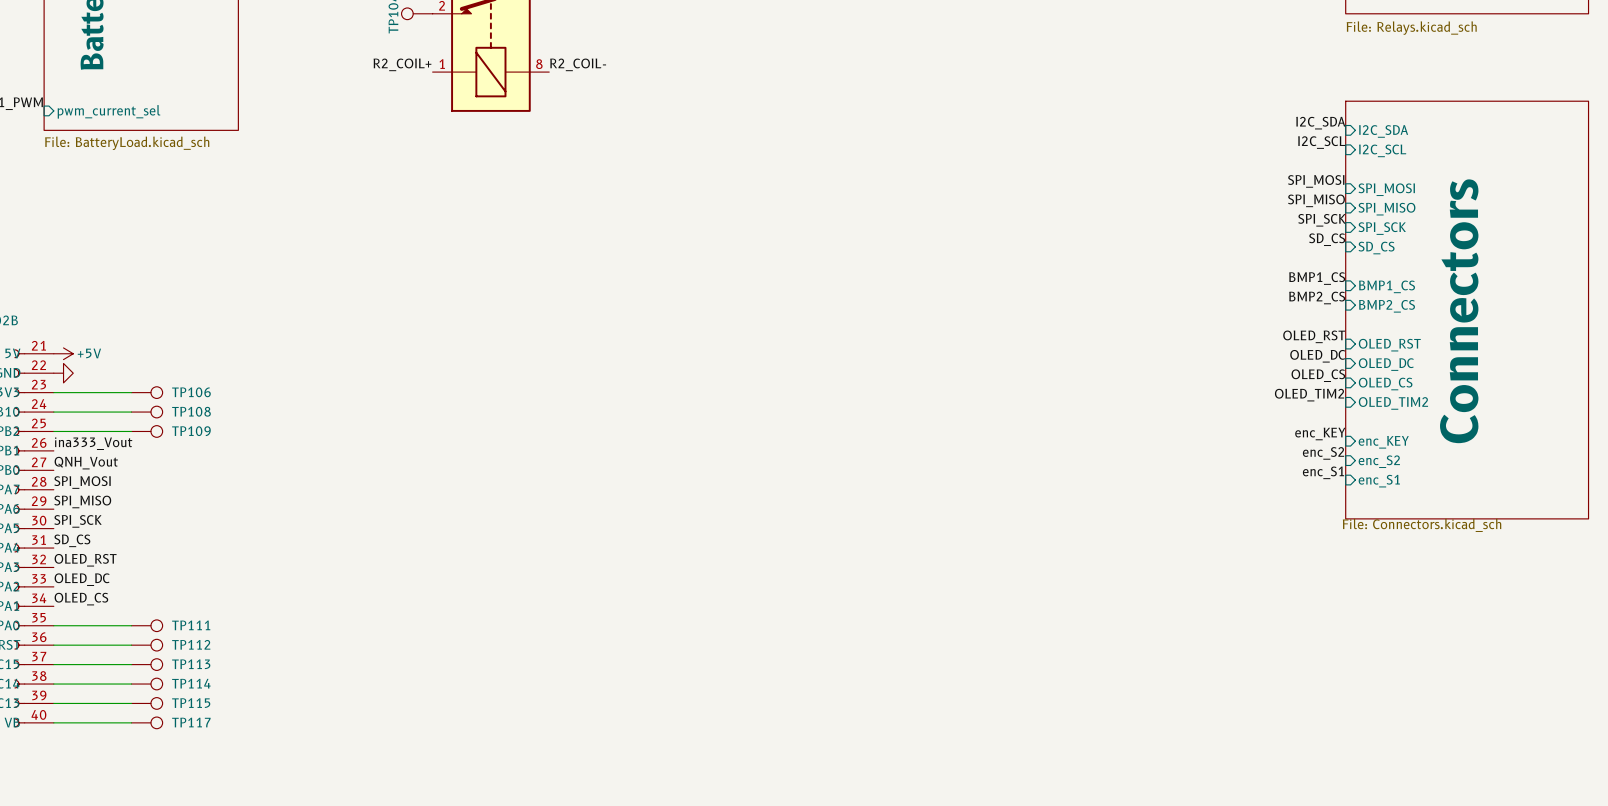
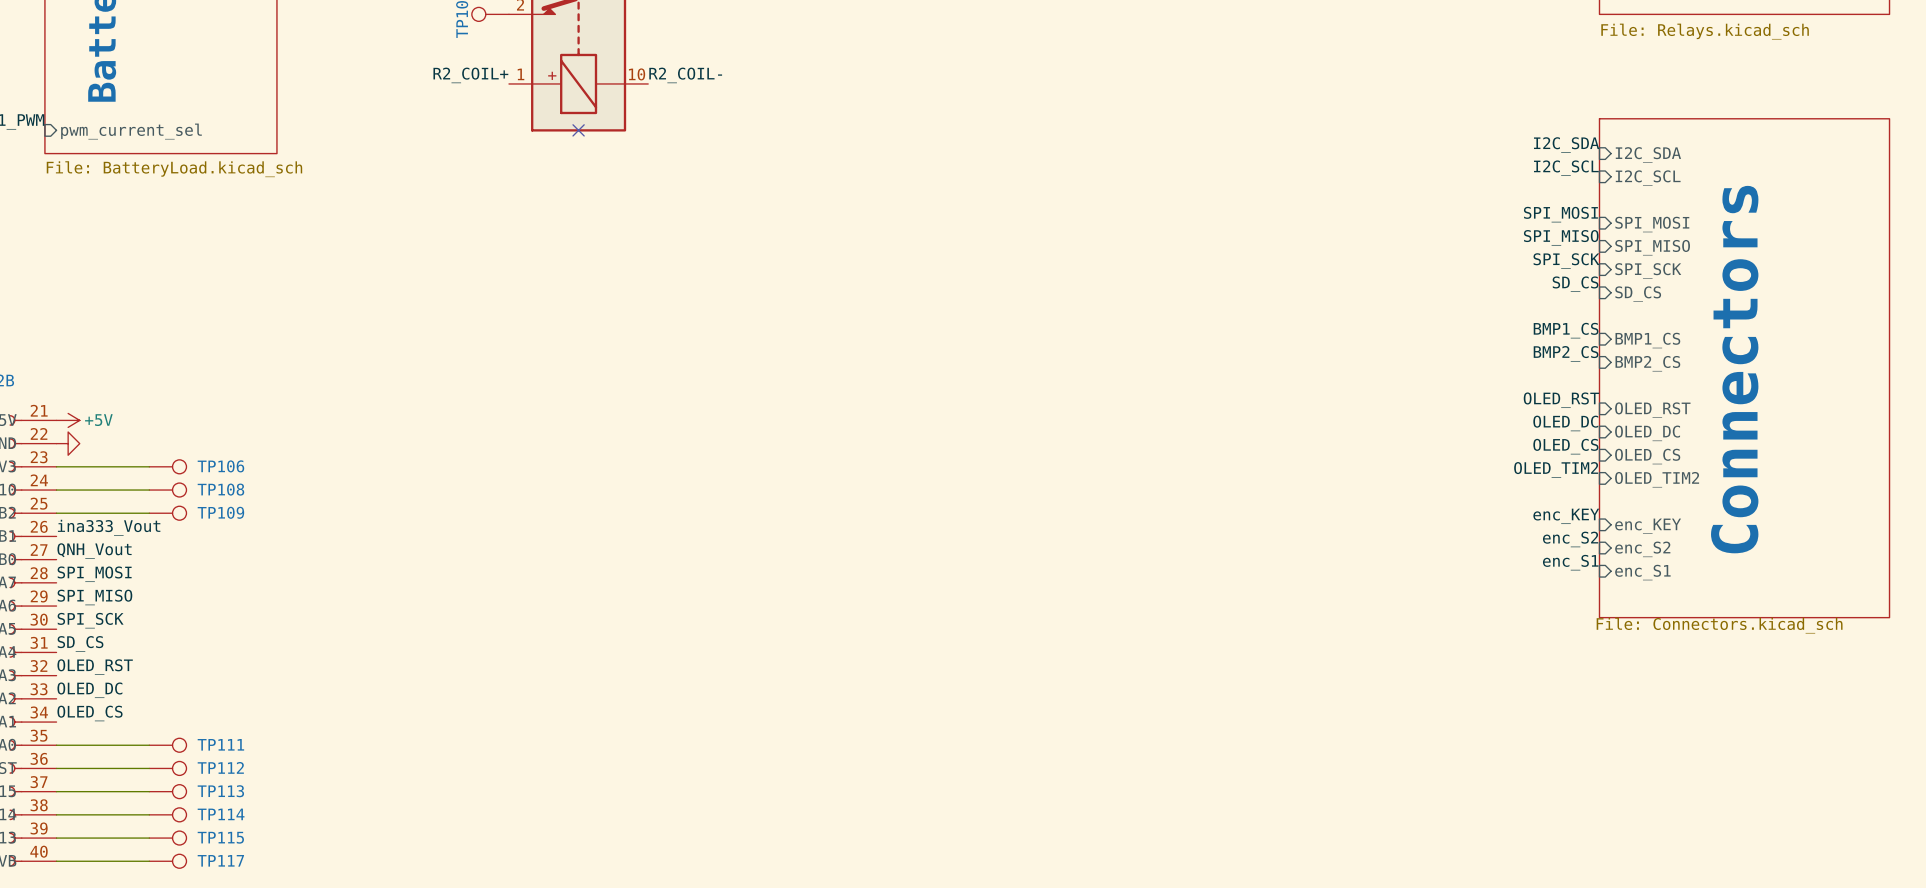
part pin number: 8 (539, 64) -> 10 (637, 74)
part text: none -> + (552, 75)
no-connect mark: none -> (578, 130)

